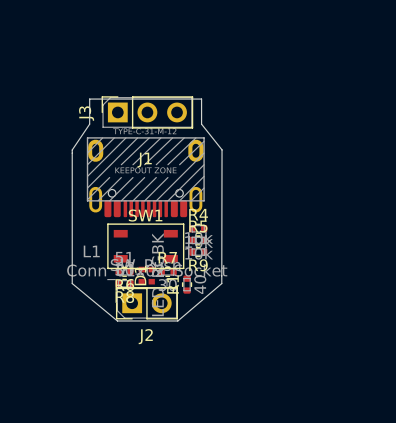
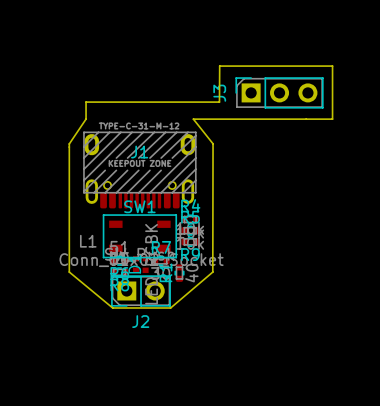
board edge: (89, 106) (89, 99) (201, 99) (201, 124) -> (86, 102) (219, 102) (219, 66) (332, 66) (332, 119) (193, 119)
J3 position: (147, 112) -> (279, 92)

